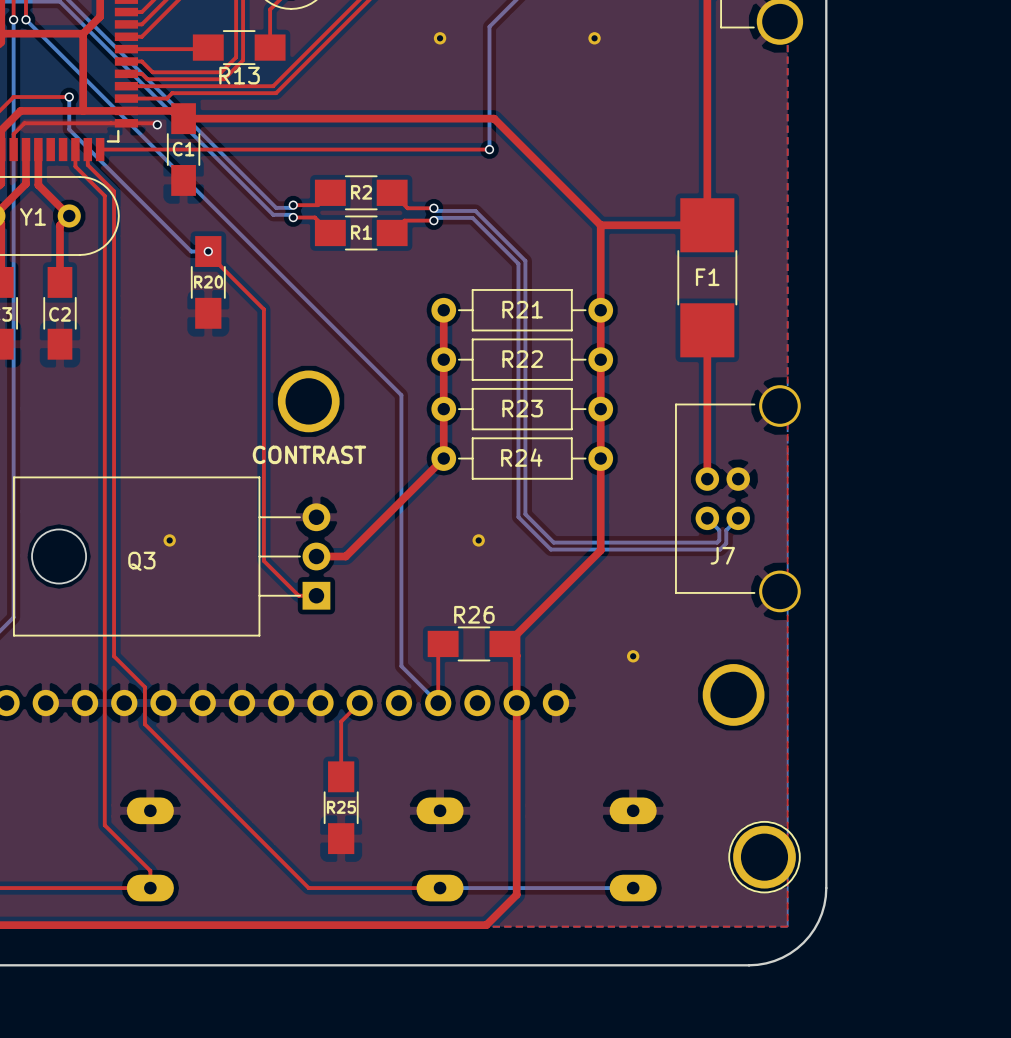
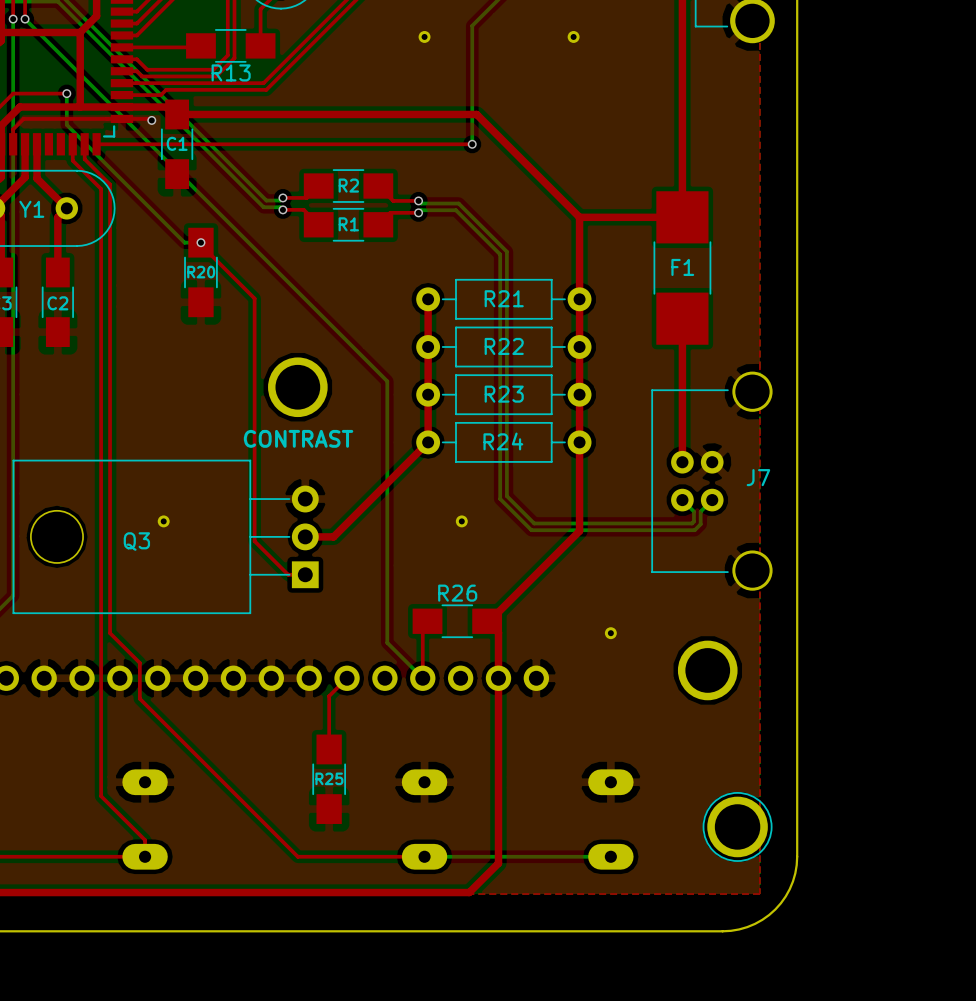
J7 name position: J7 (722, 555) -> J7 (758, 477)

